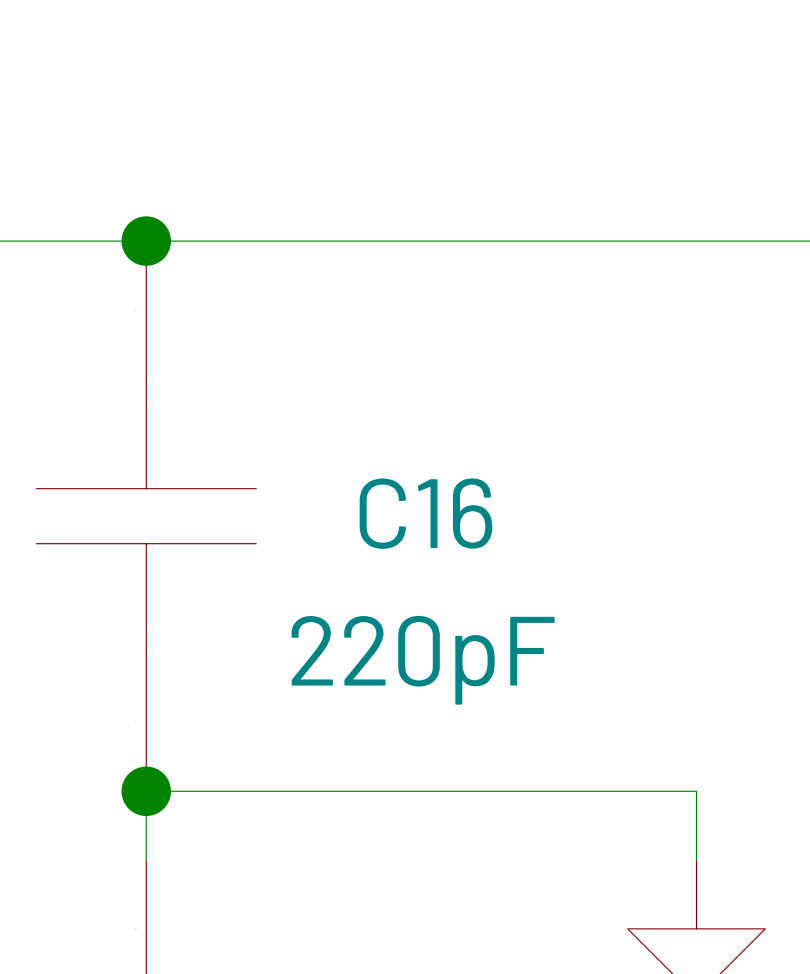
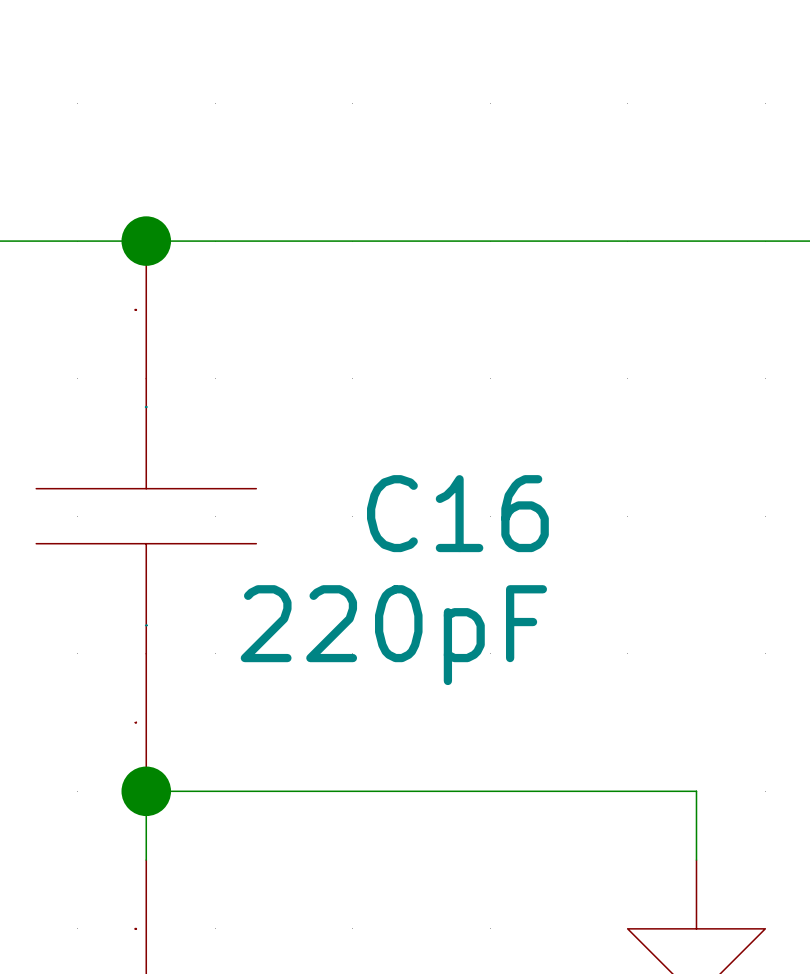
C16 value position: 220pF (423, 660) -> 220pF (393, 635)

